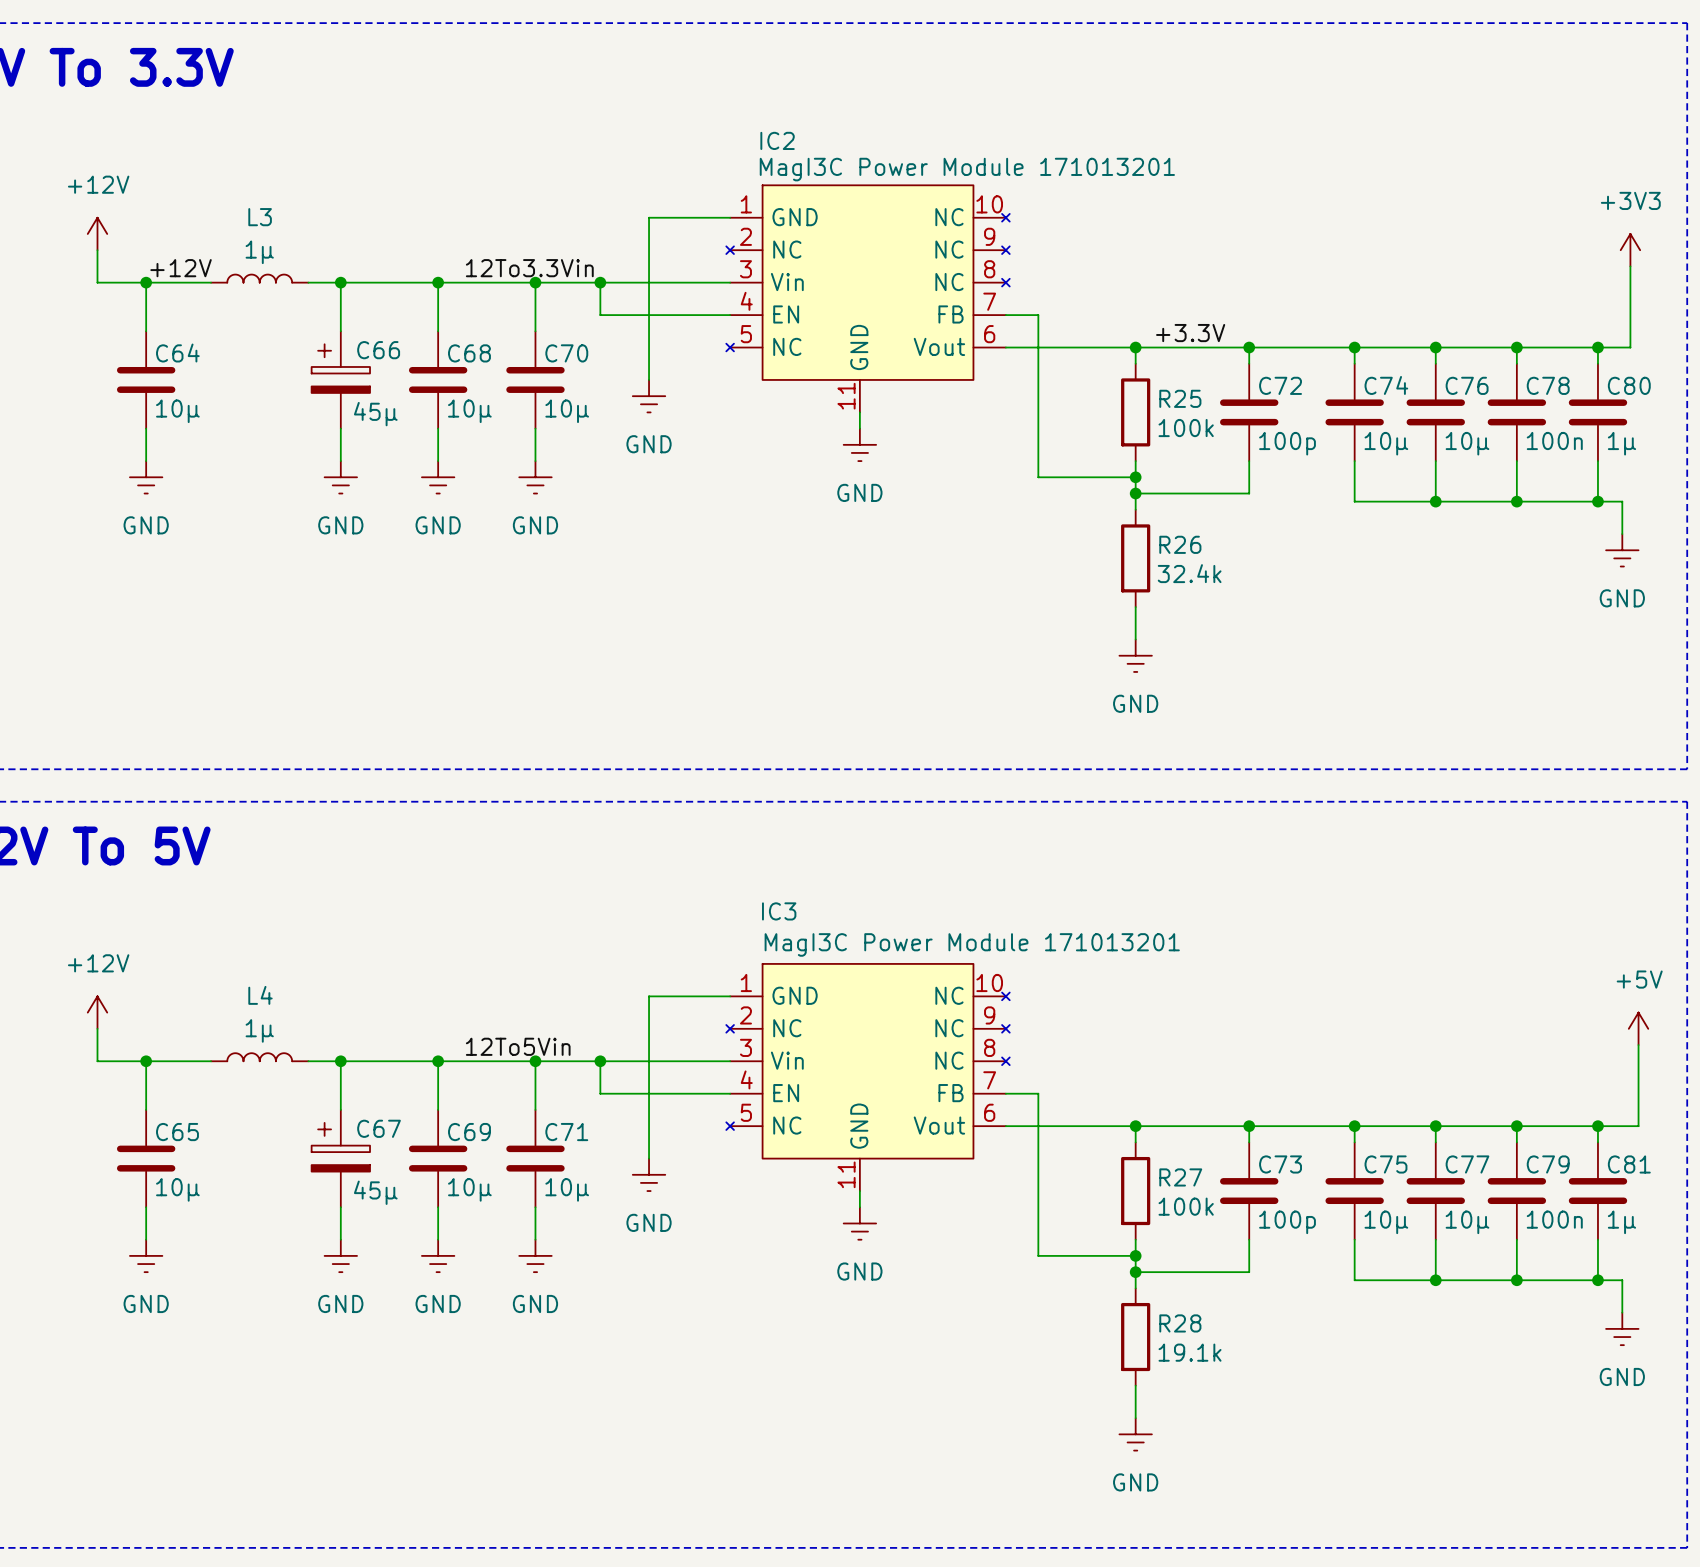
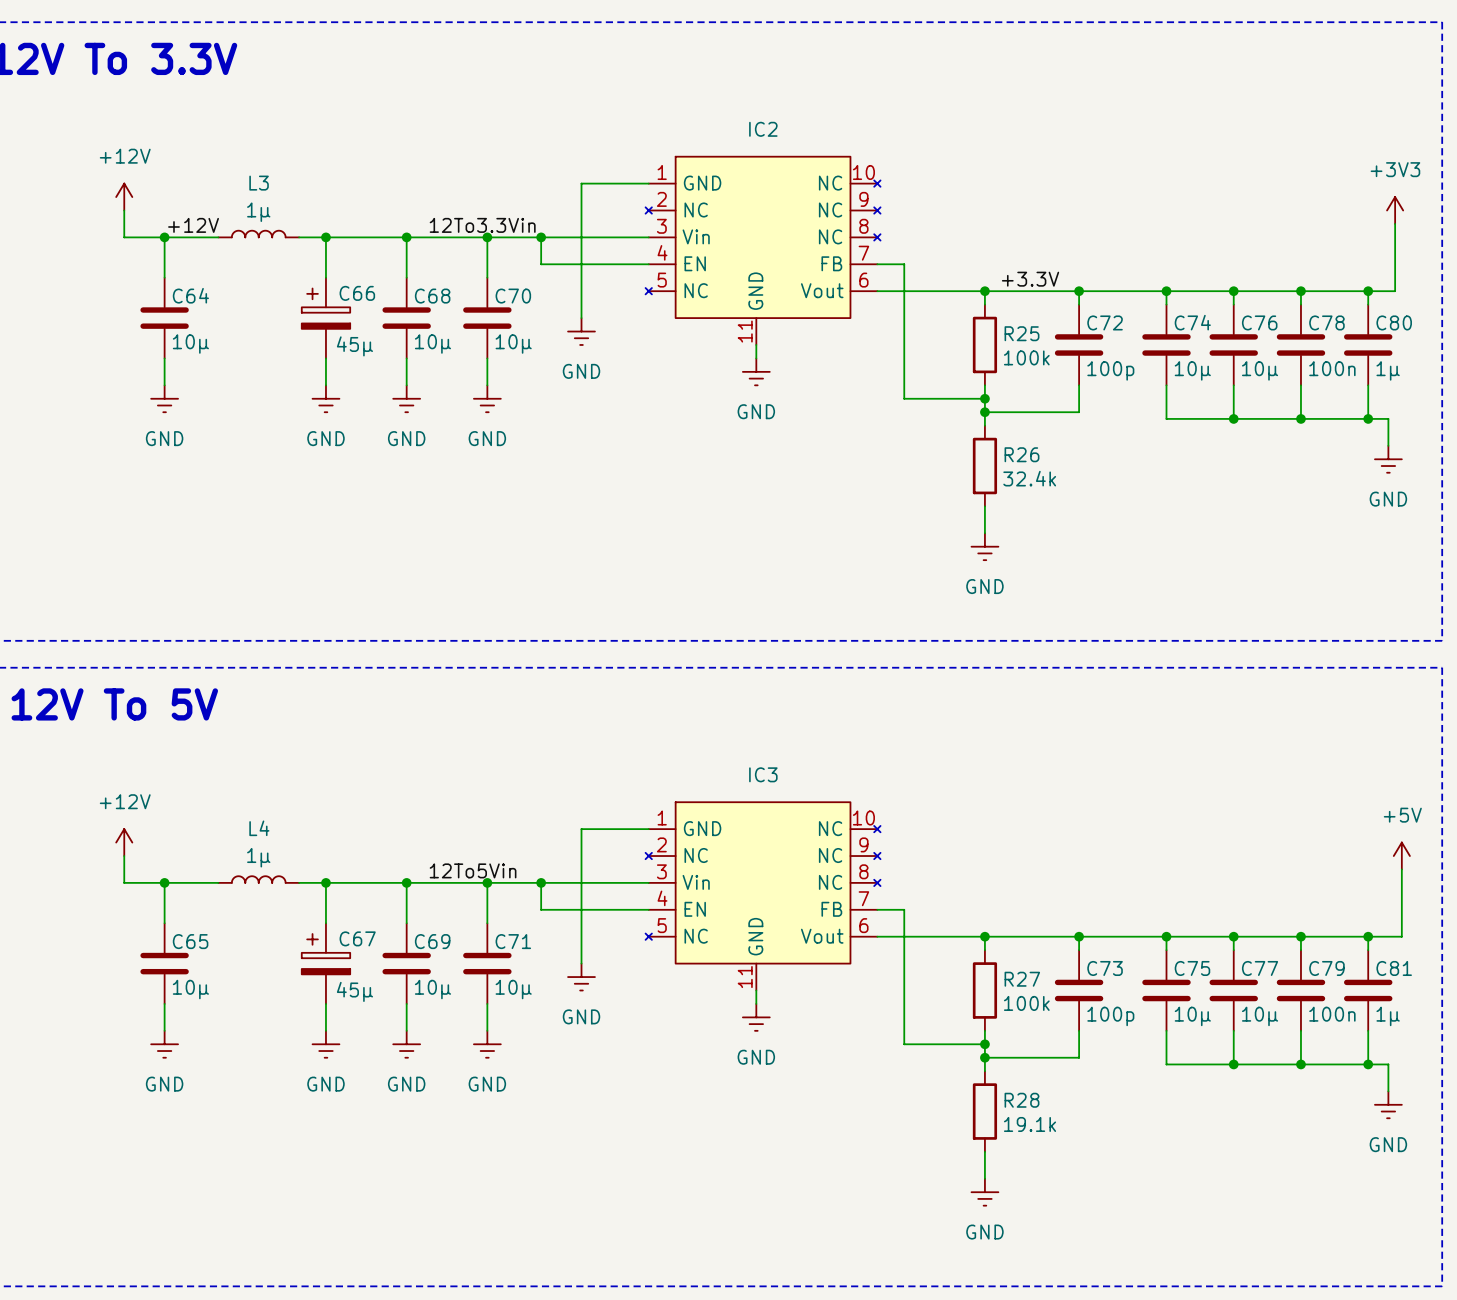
IC2 name position: IC2 (777, 140) -> IC2 (763, 129)
IC2 value: MagI3C Power Module 171013201 (967, 169) -> none
IC3 name position: IC3 (779, 911) -> IC3 (763, 774)
IC3 value: MagI3C Power Module 171013201 (972, 944) -> none

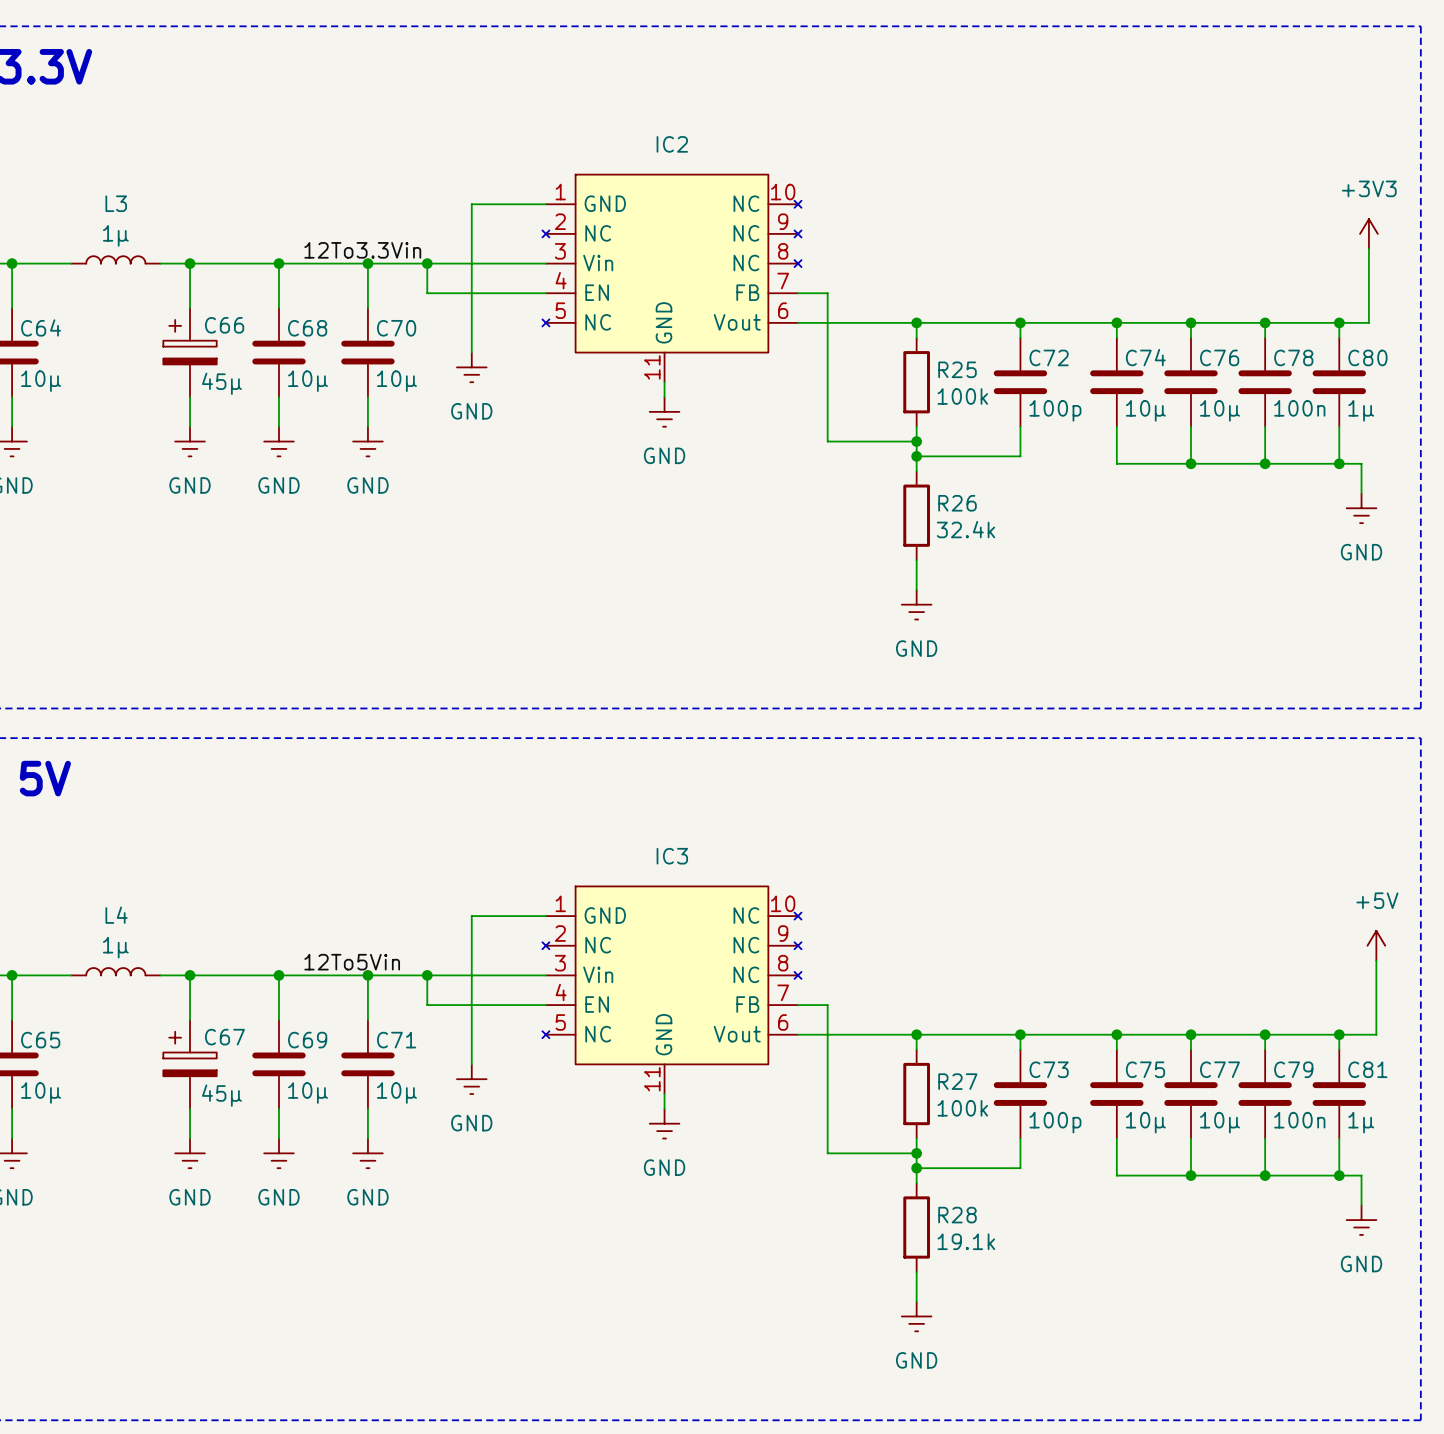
label: +12V (193, 225) -> none
label: +3.3V (1030, 279) -> none

